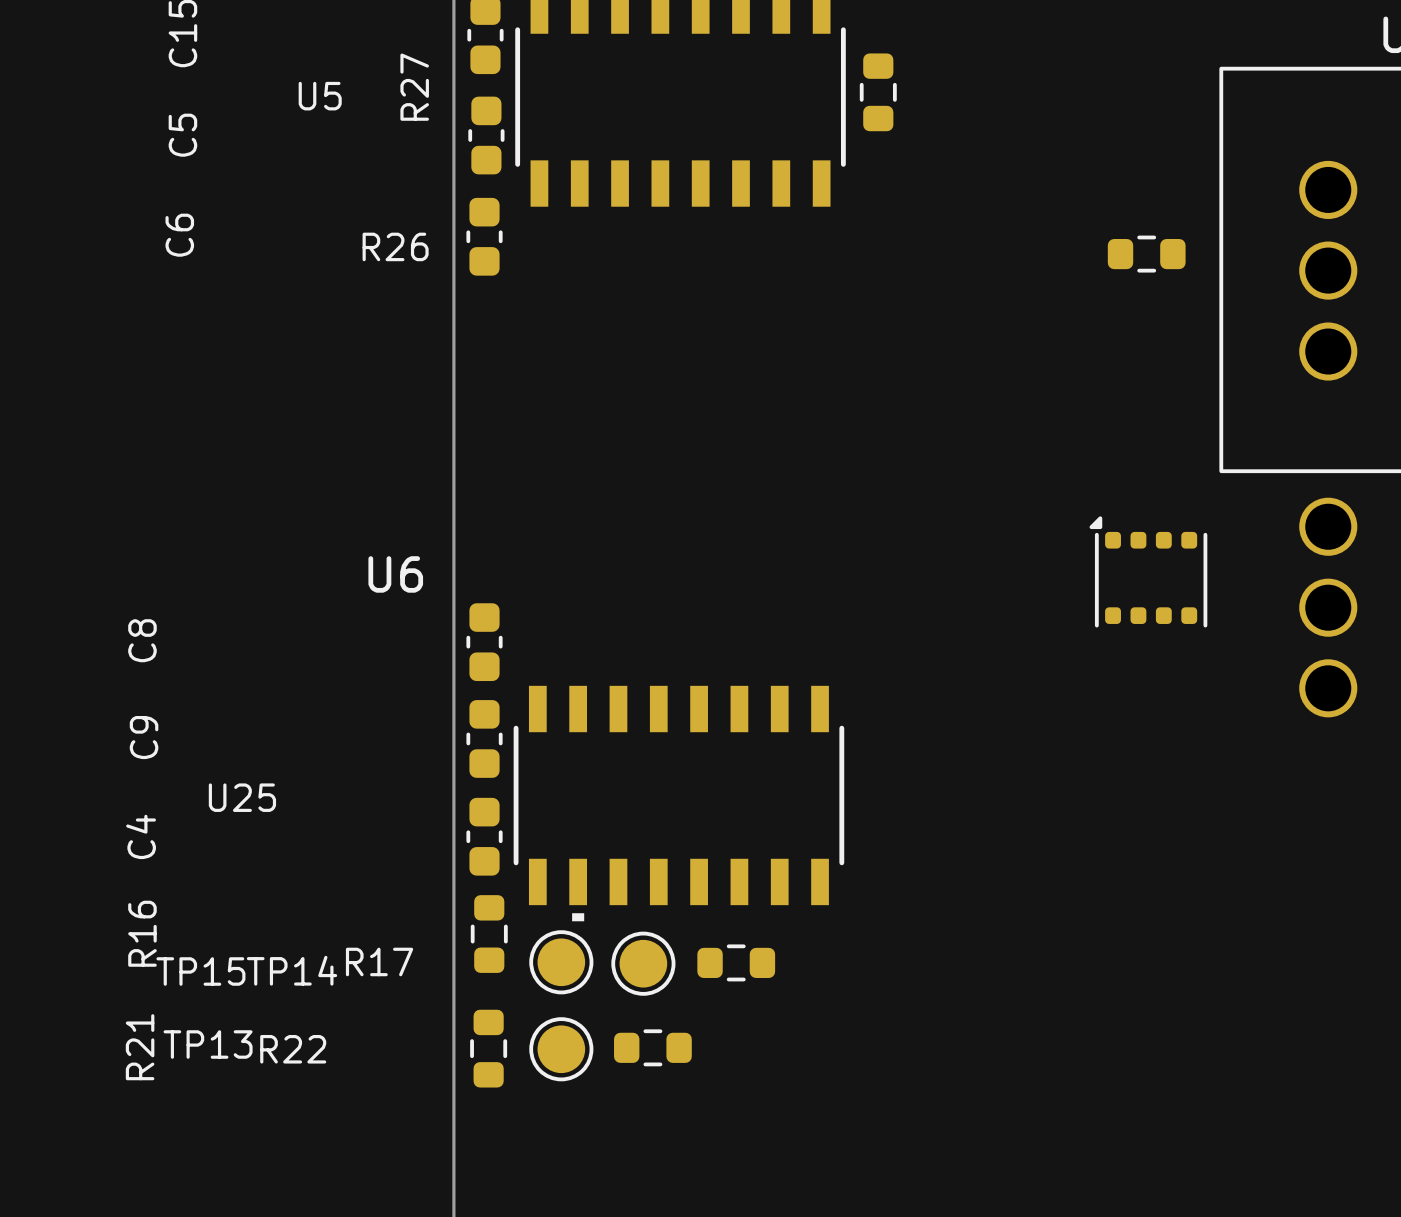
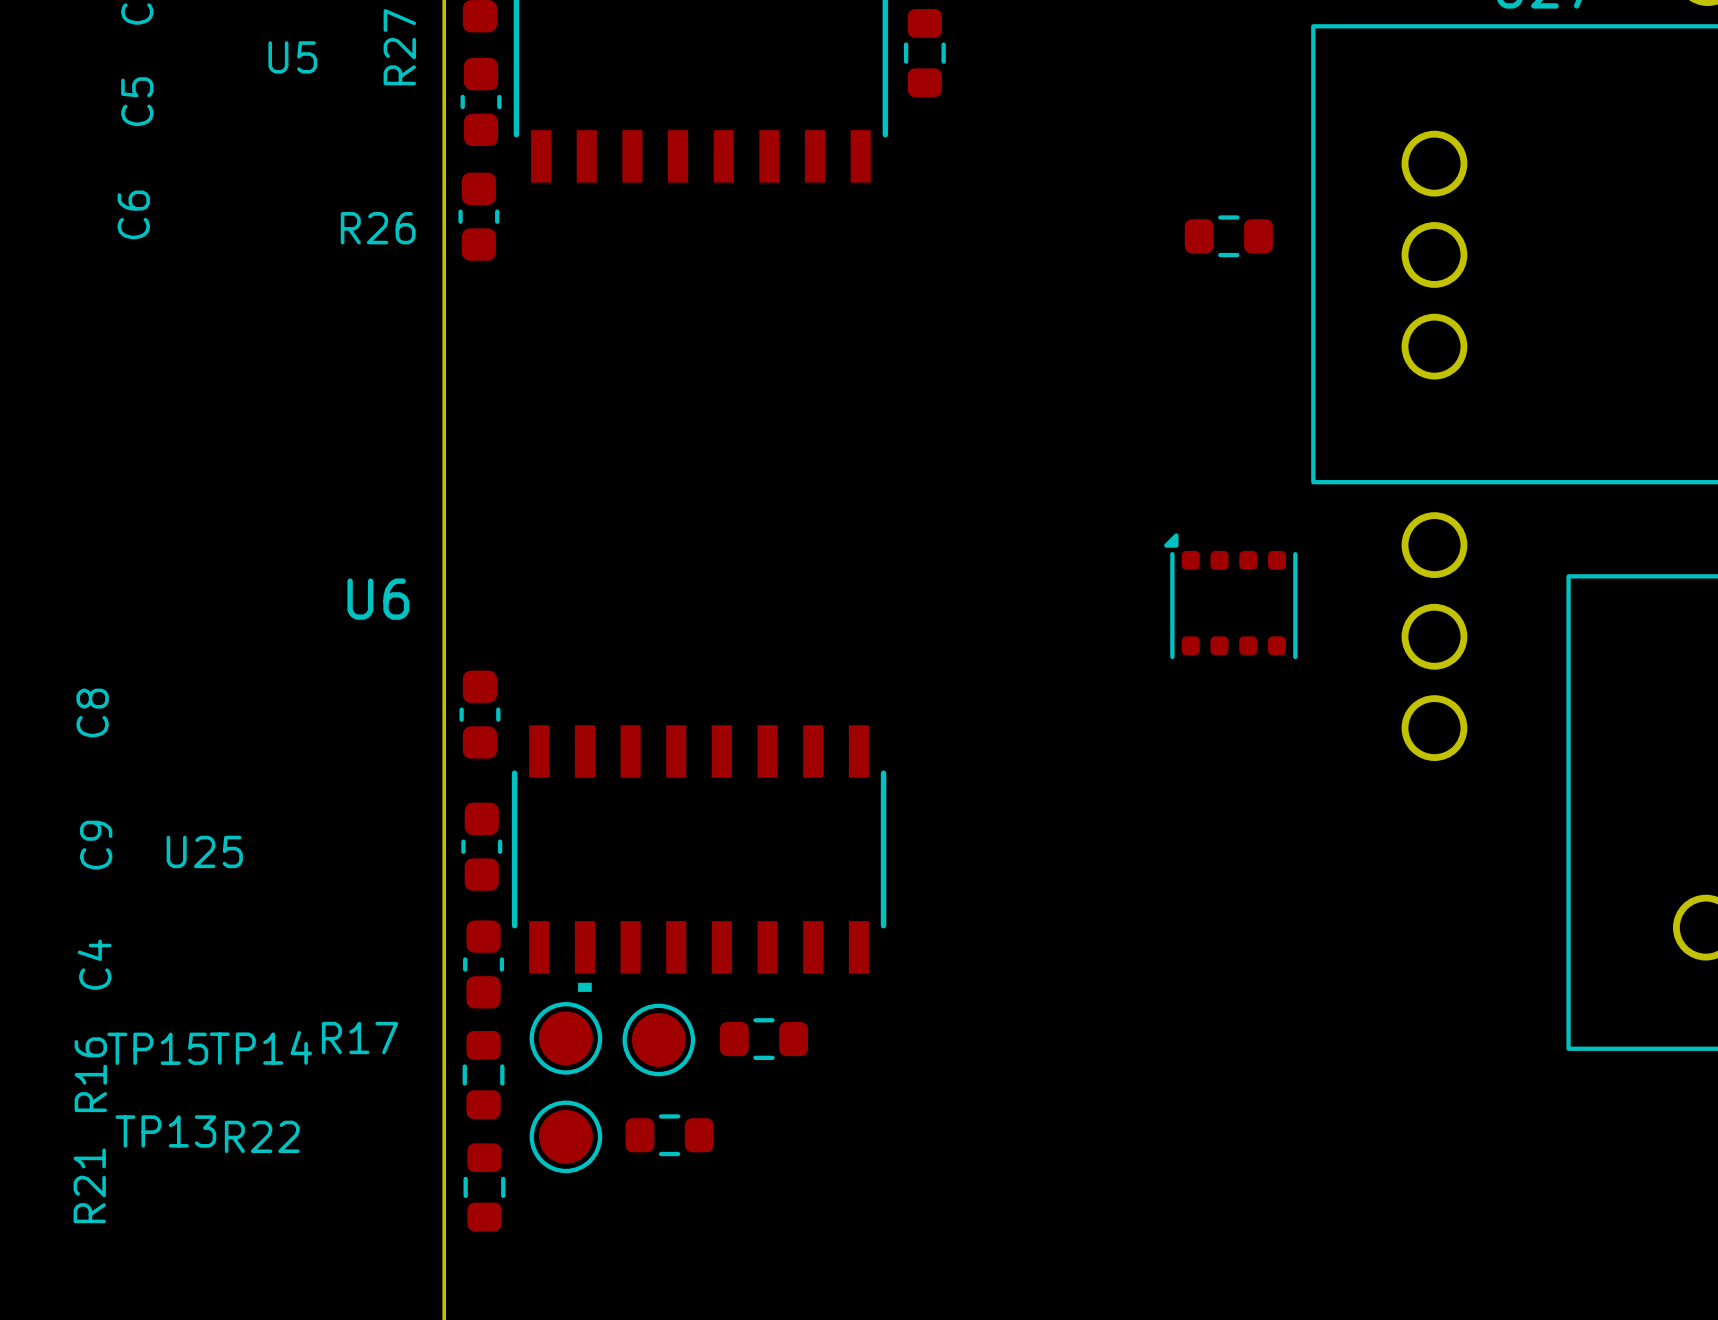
C8 position: (484, 642) -> (479, 714)
C9 position: (484, 738) -> (481, 846)
C4 position: (484, 836) -> (483, 964)
R16 position: (489, 934) -> (483, 1075)
R21 position: (488, 1048) -> (484, 1187)

